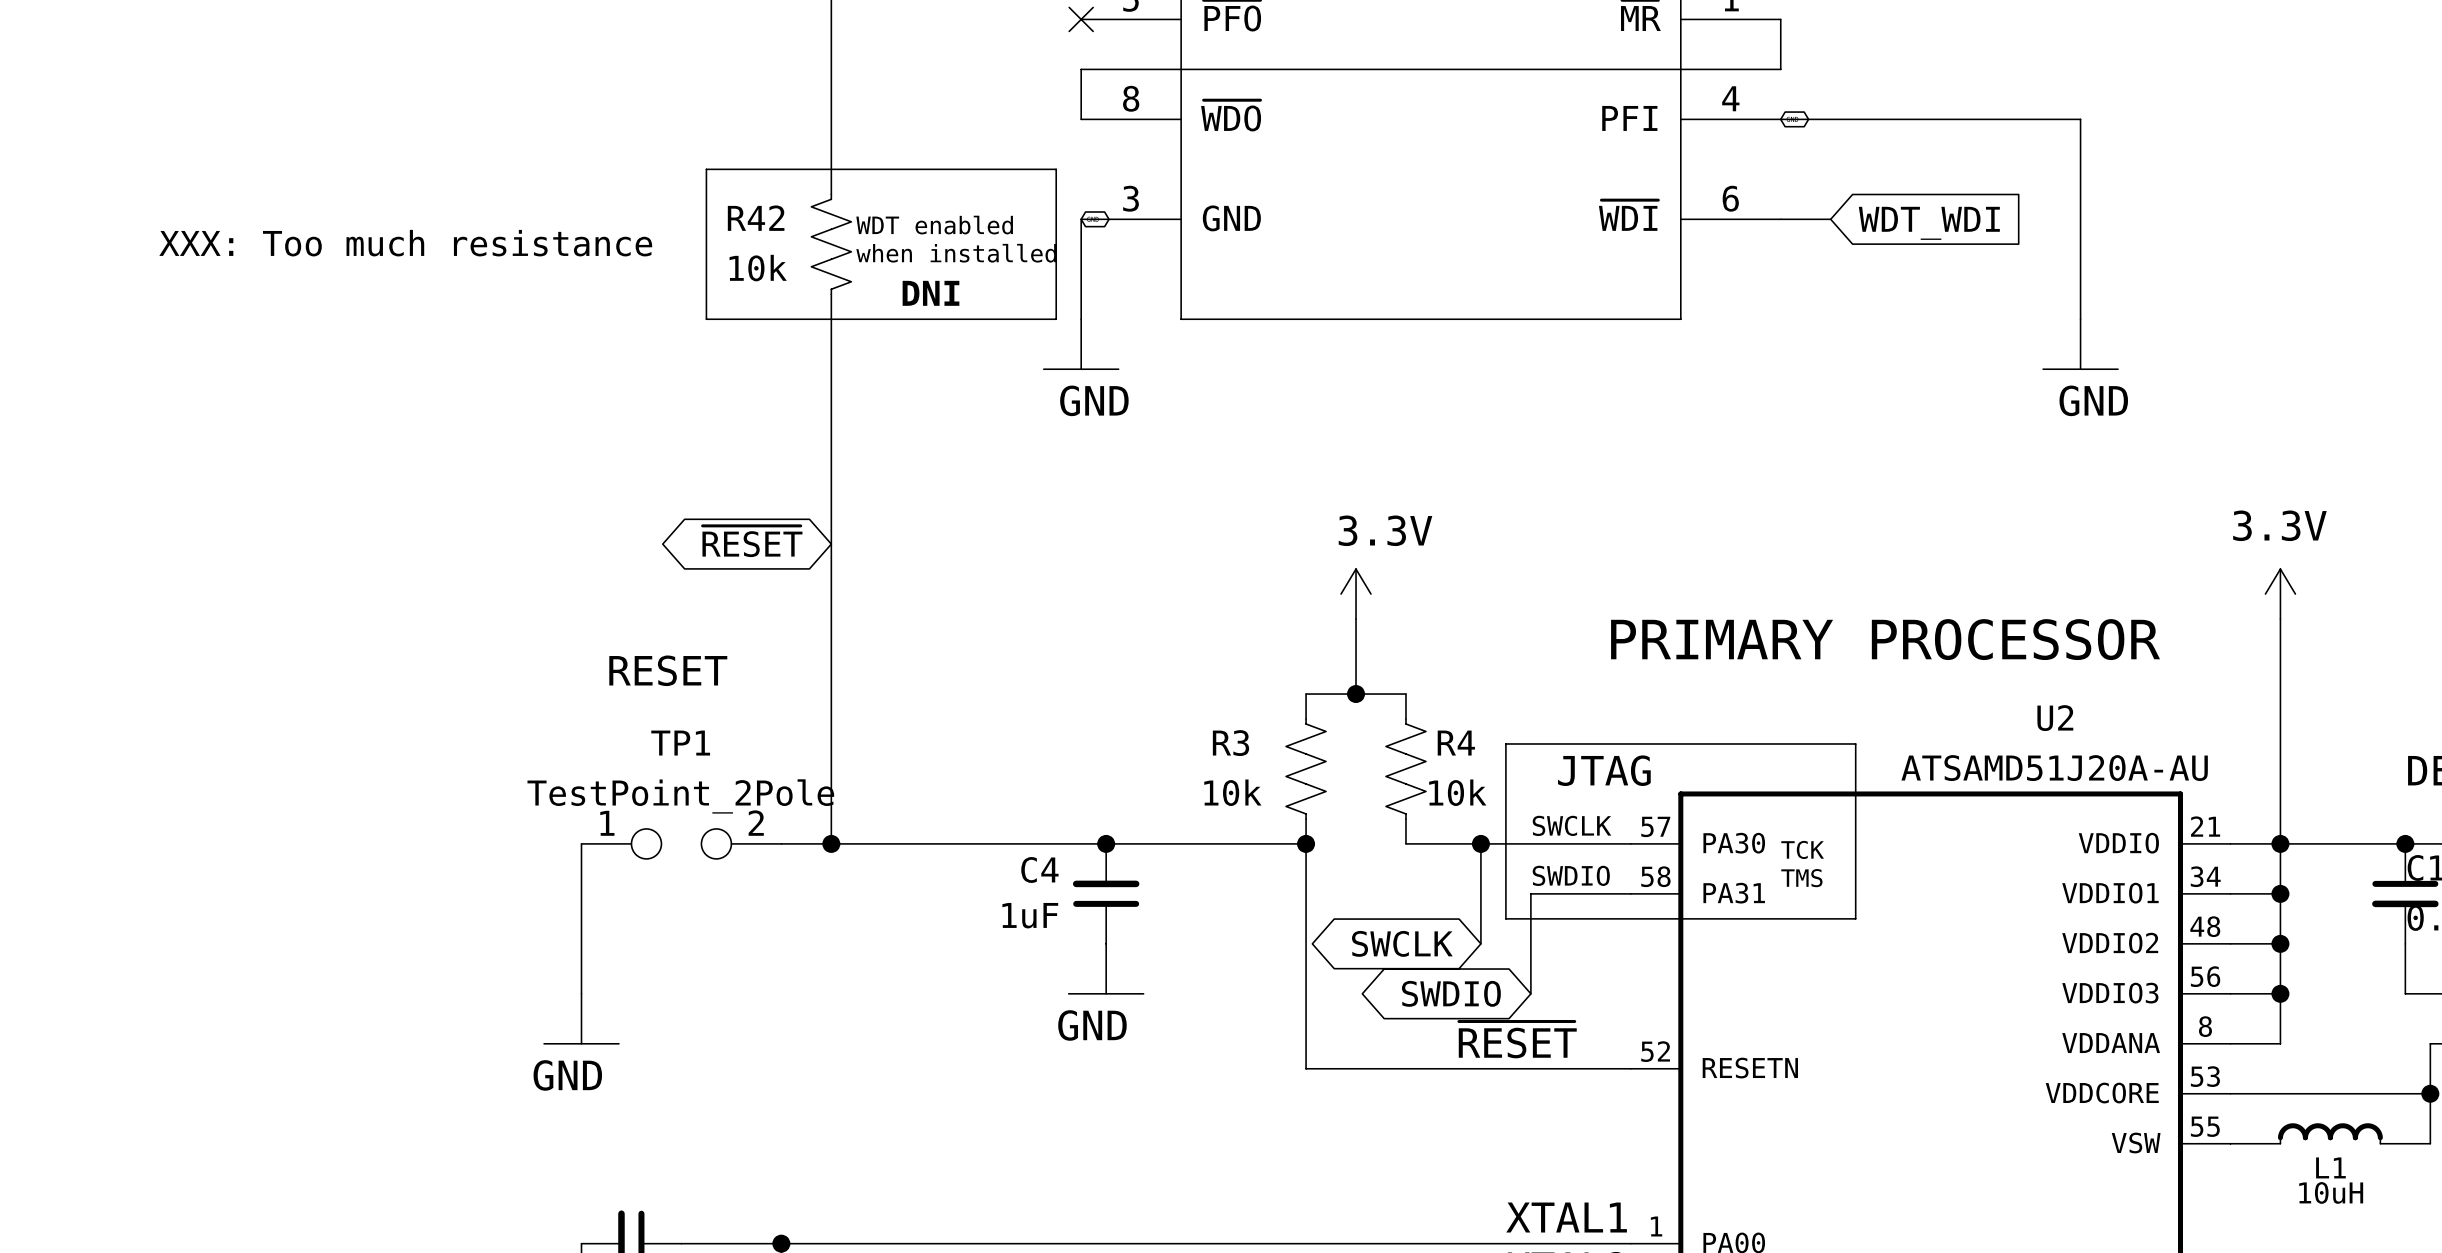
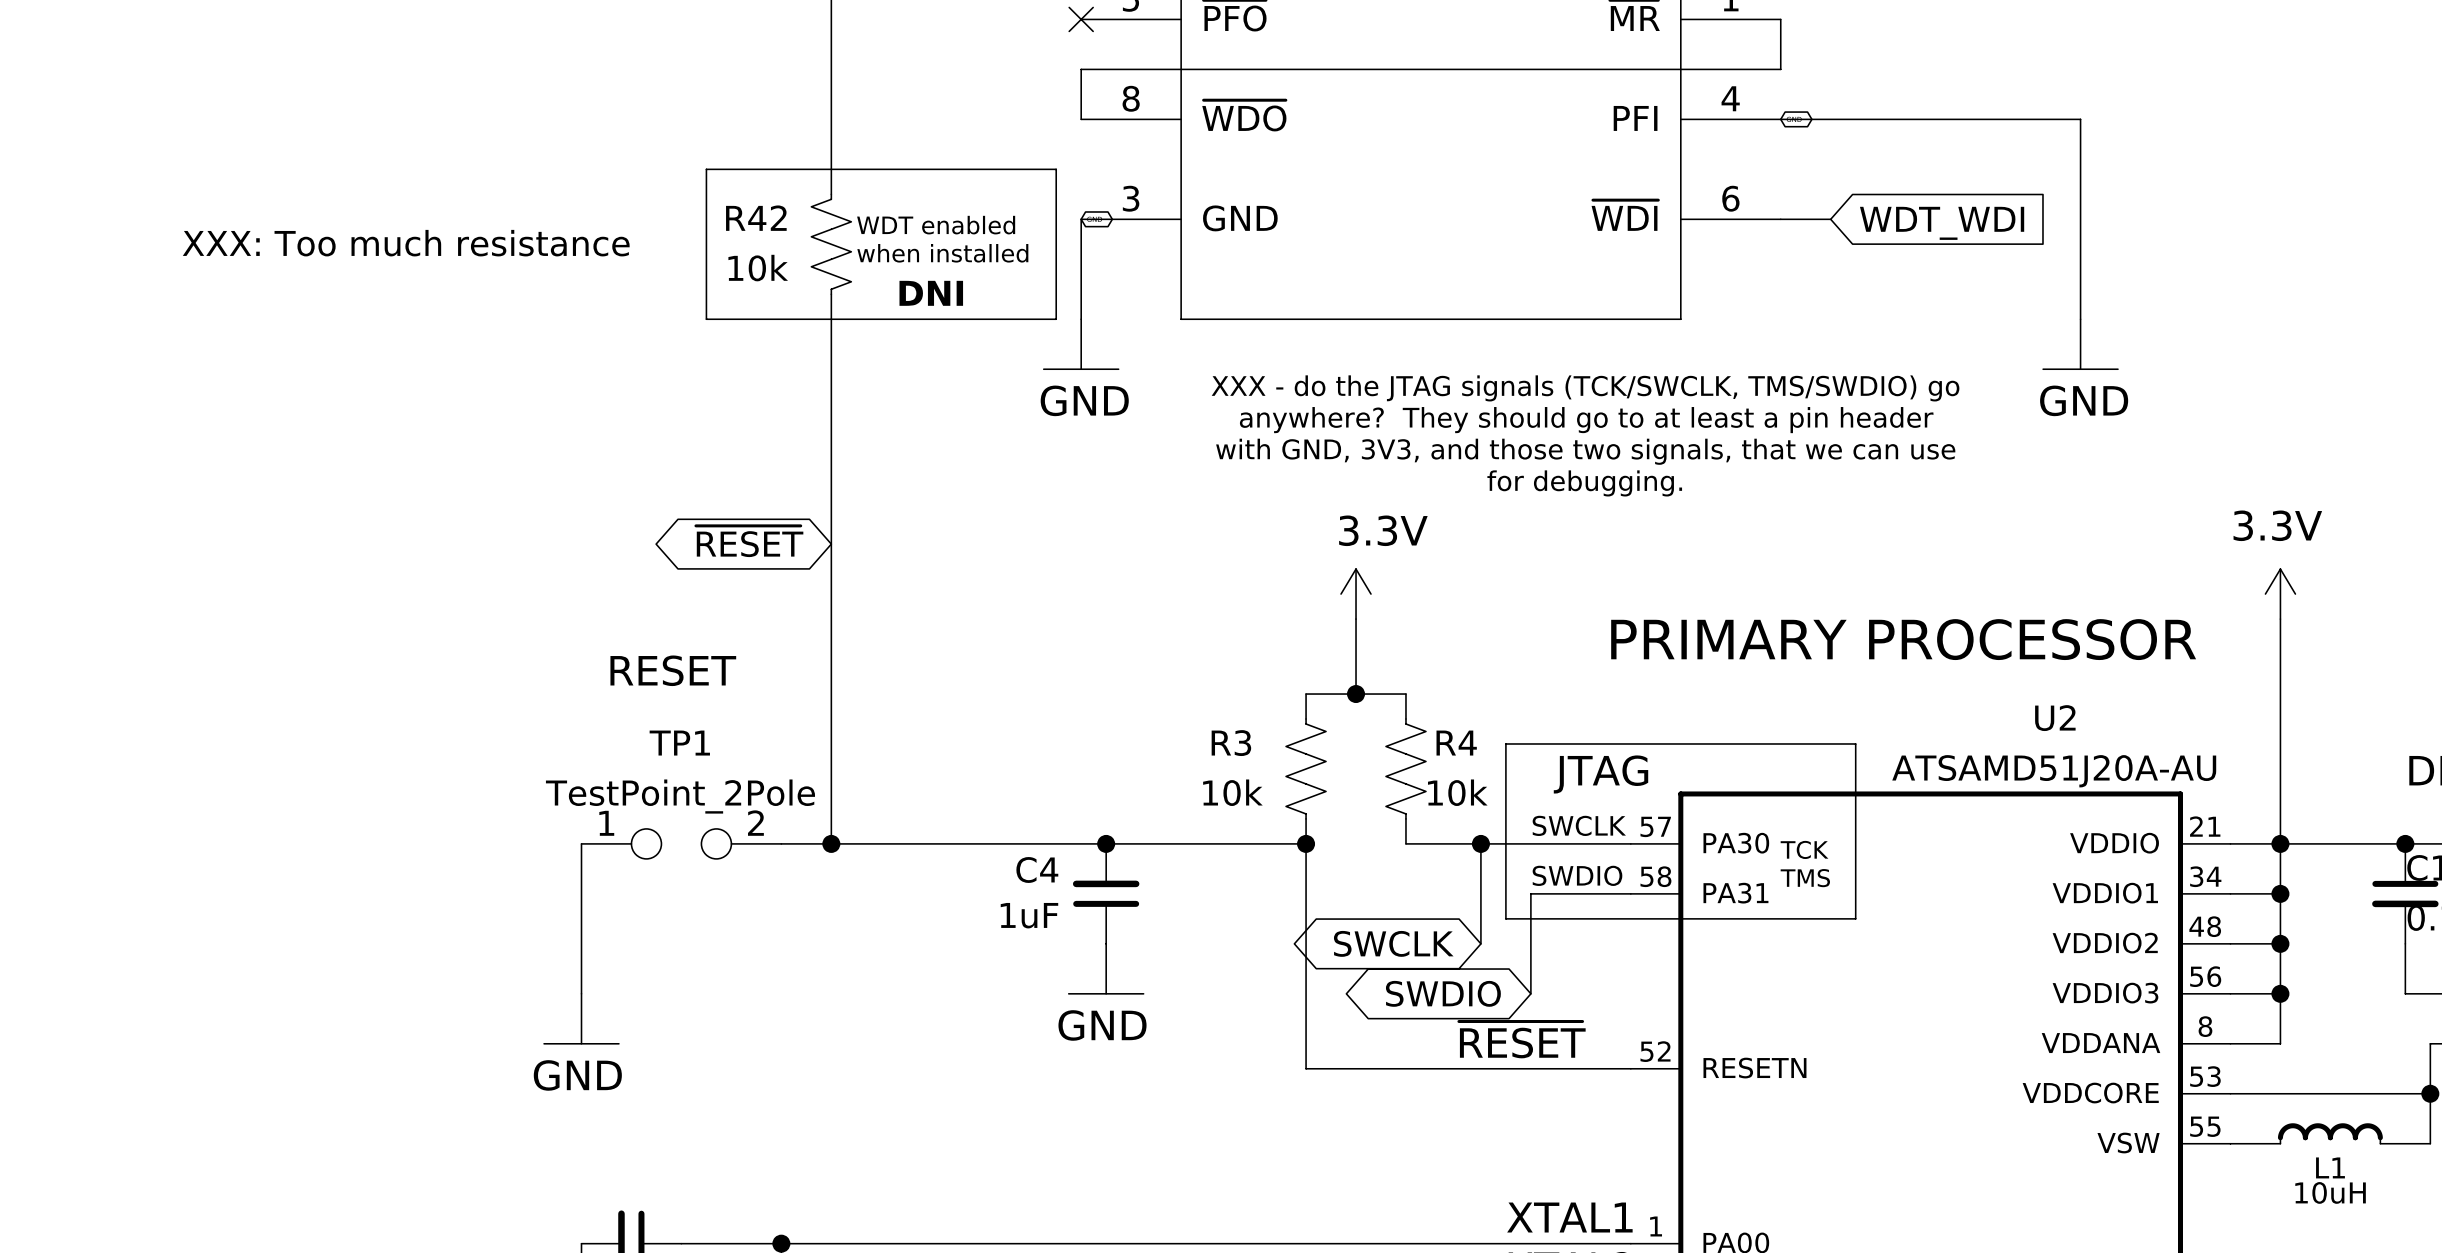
text: none -> XXX - do the JTAG signals (TCK/SWCLK, TMS/SWDIO) go (1585, 388)
text: none -> anywhere? They should go to at least a pin header (1586, 420)
text: none -> with GND, 3V3, and those two signals, that we can use (1585, 451)
text: none -> for debugging. (1584, 483)

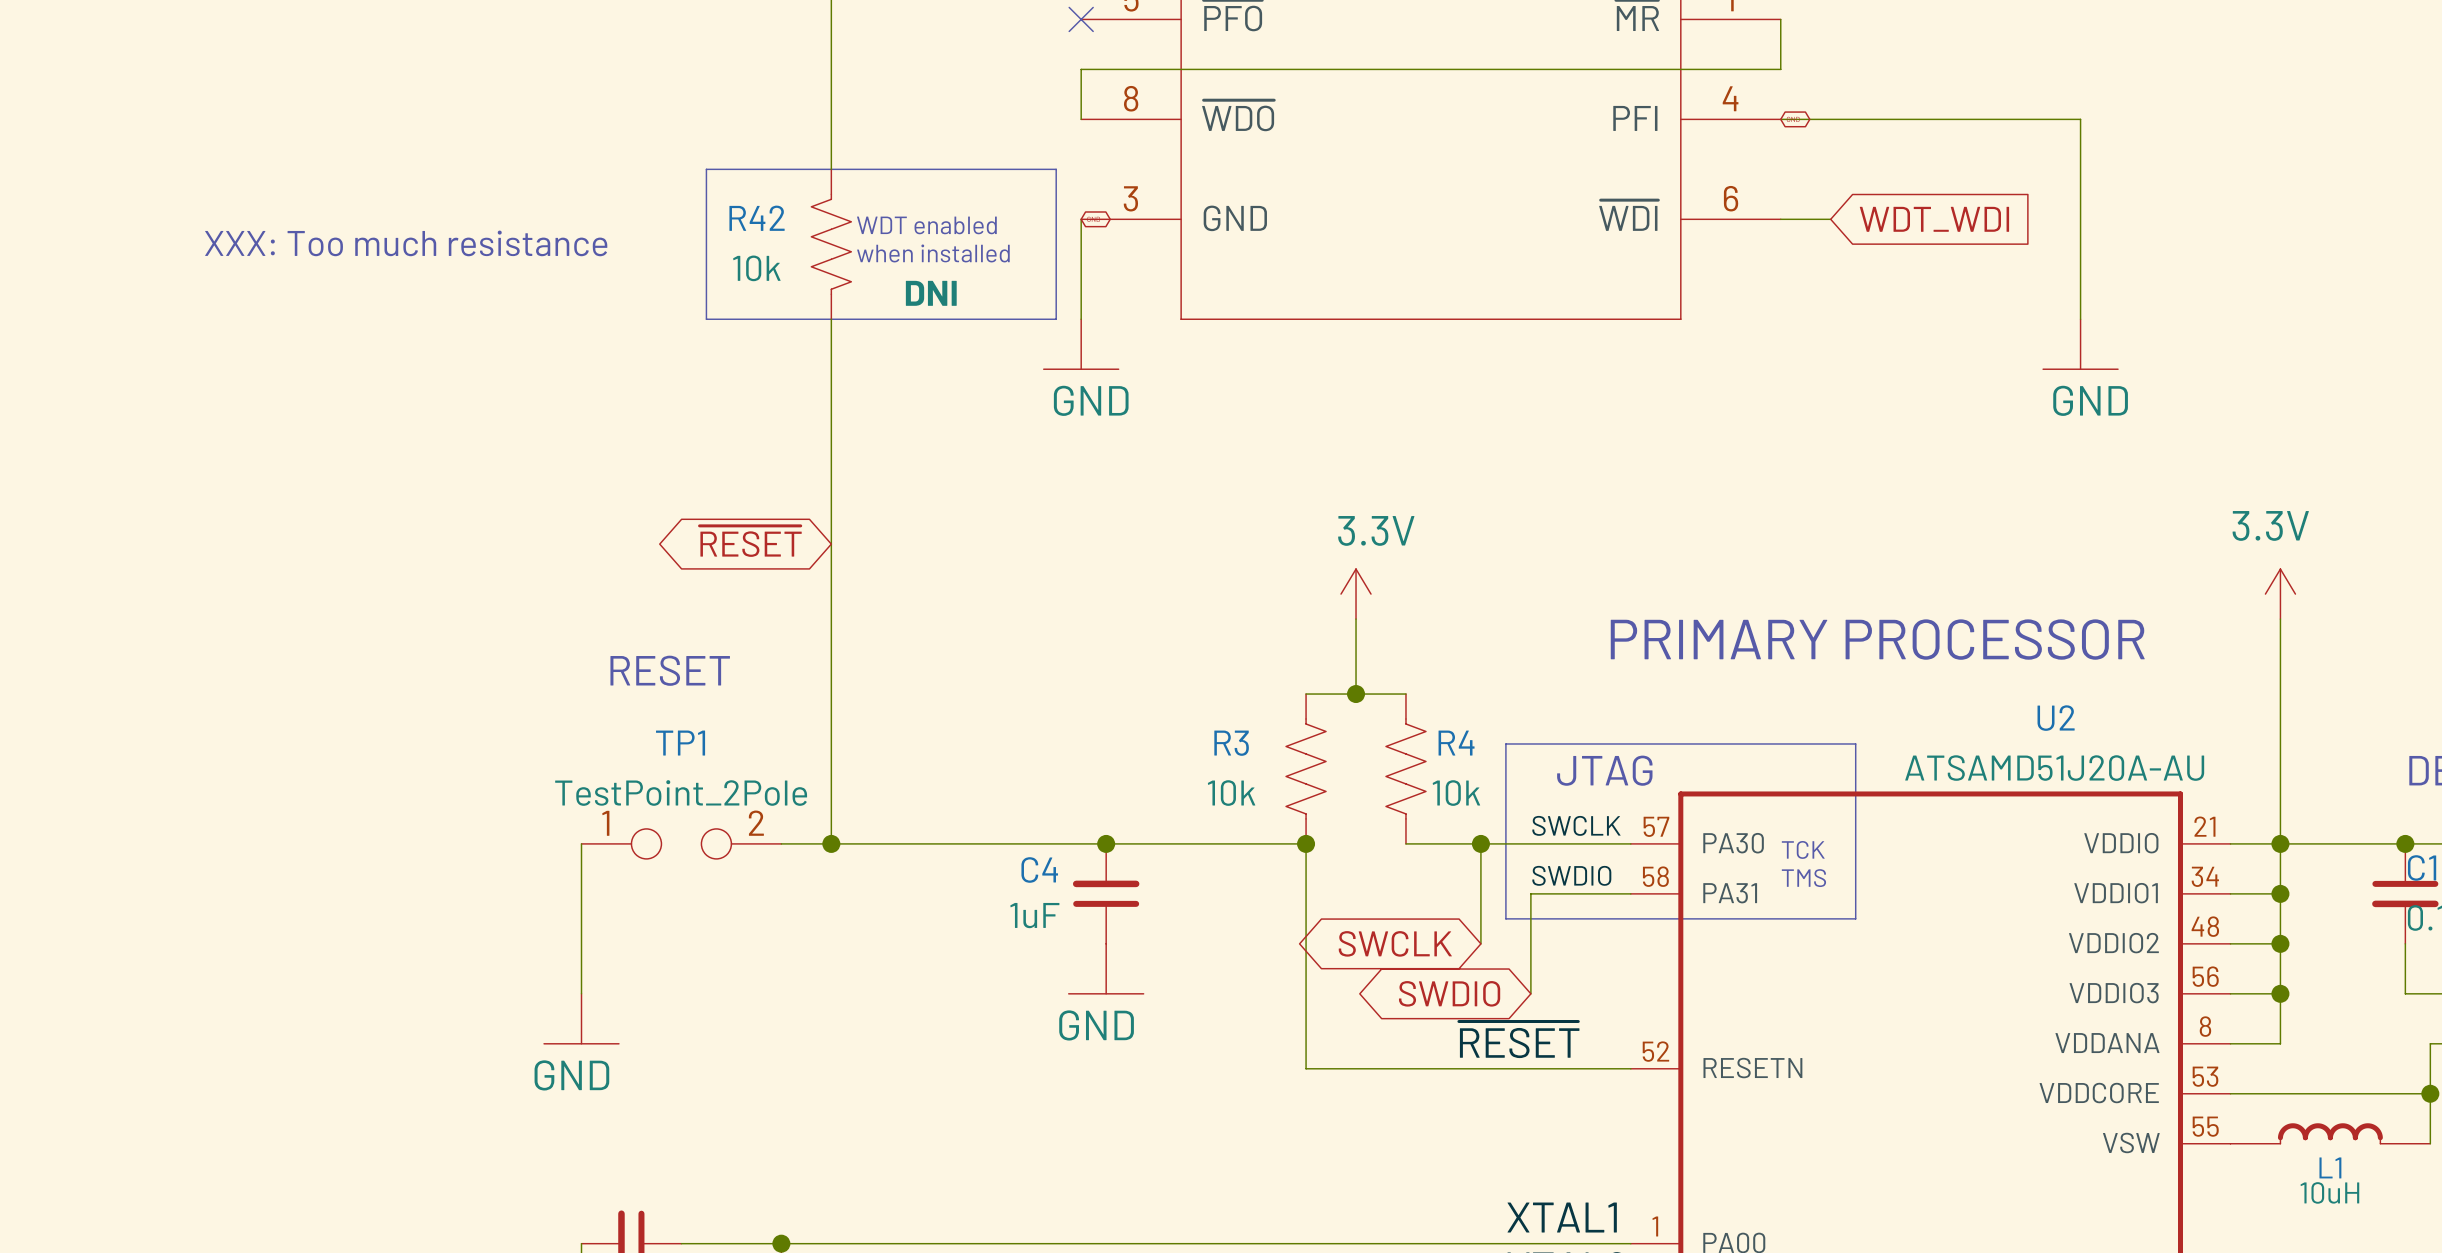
text: XXX - do the JTAG signals (TCK/SWCLK, TMS/SWDIO) go (1585, 388) -> none
text: anywhere? They should go to at least a pin header (1586, 420) -> none
text: with GND, 3V3, and those two signals, that we can use (1585, 451) -> none
text: for debugging. (1584, 483) -> none

